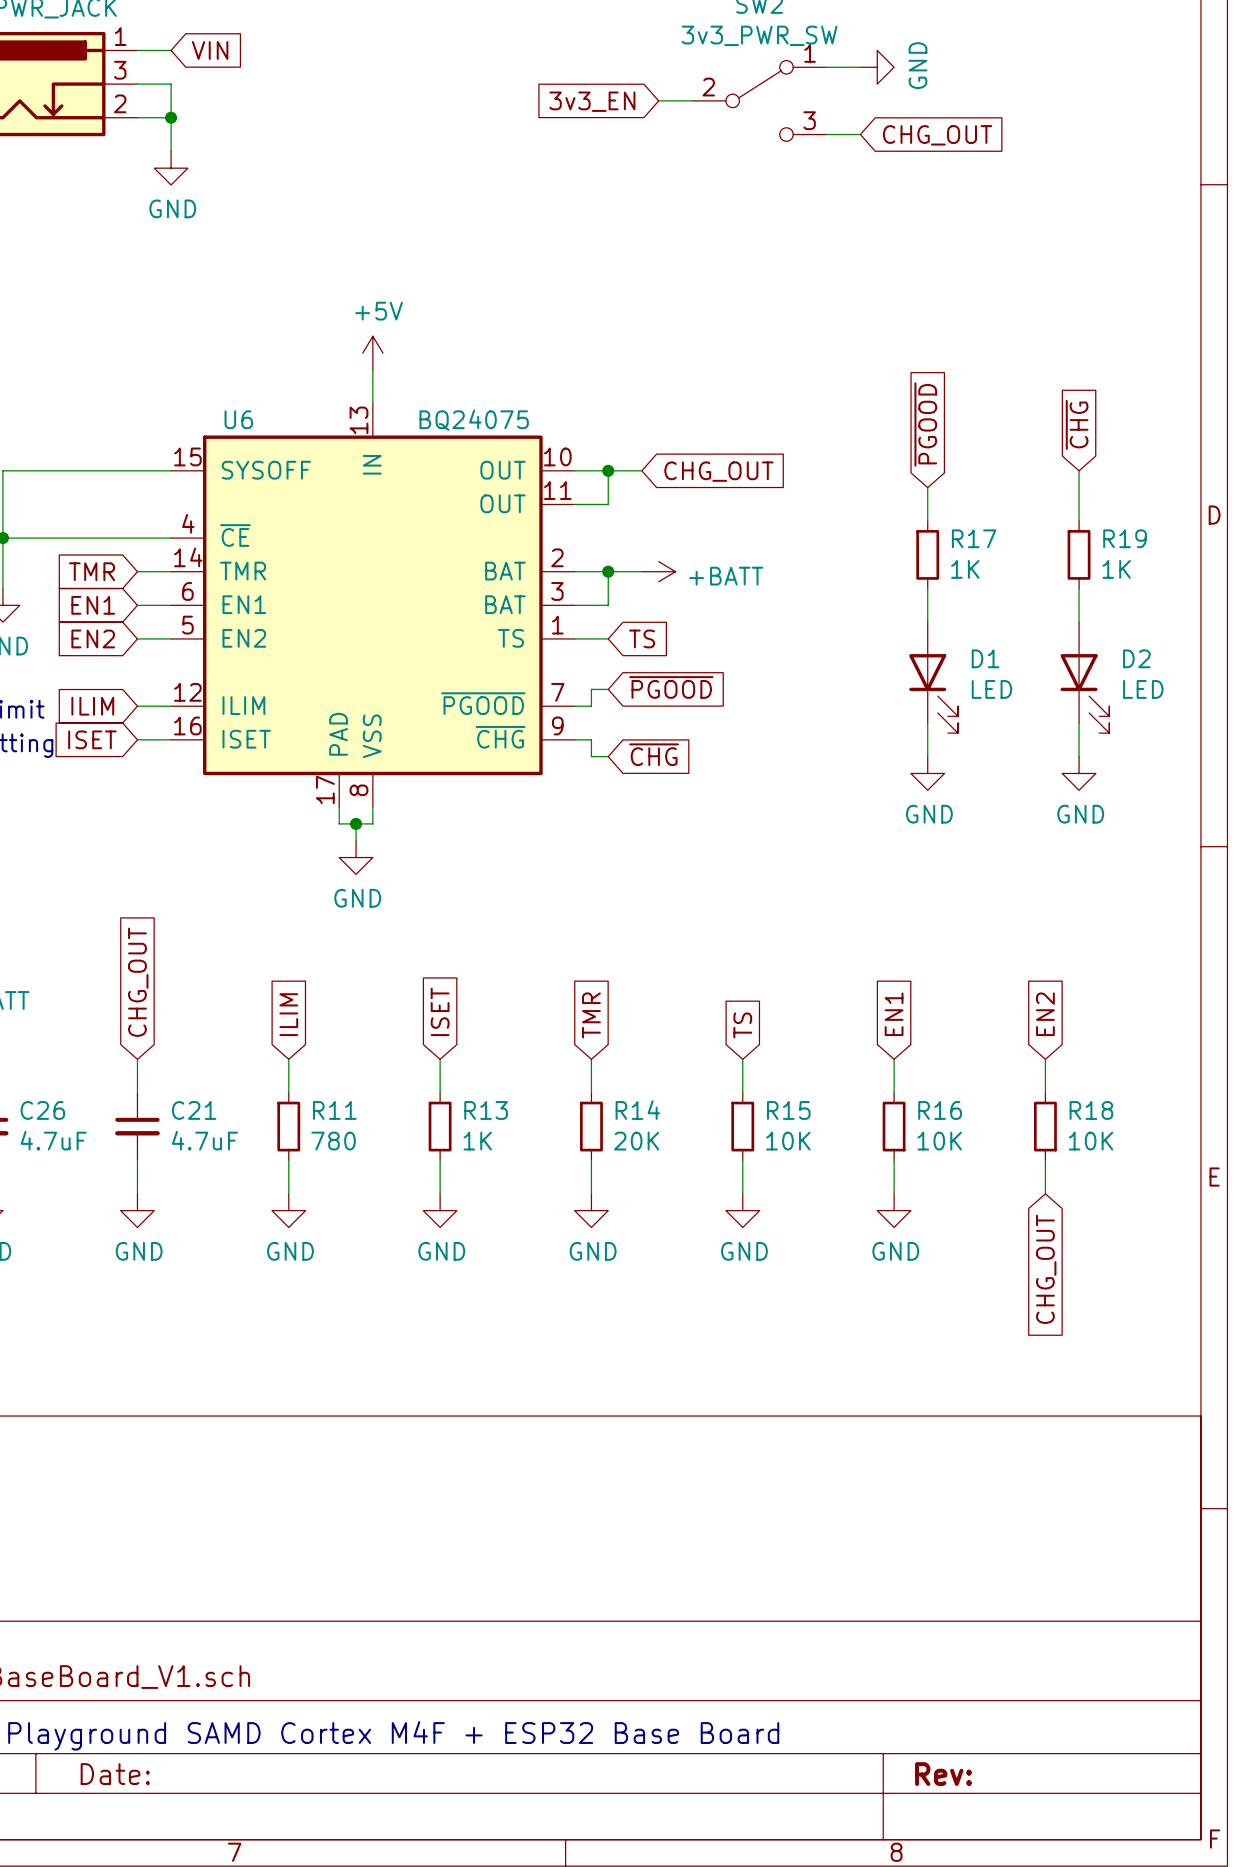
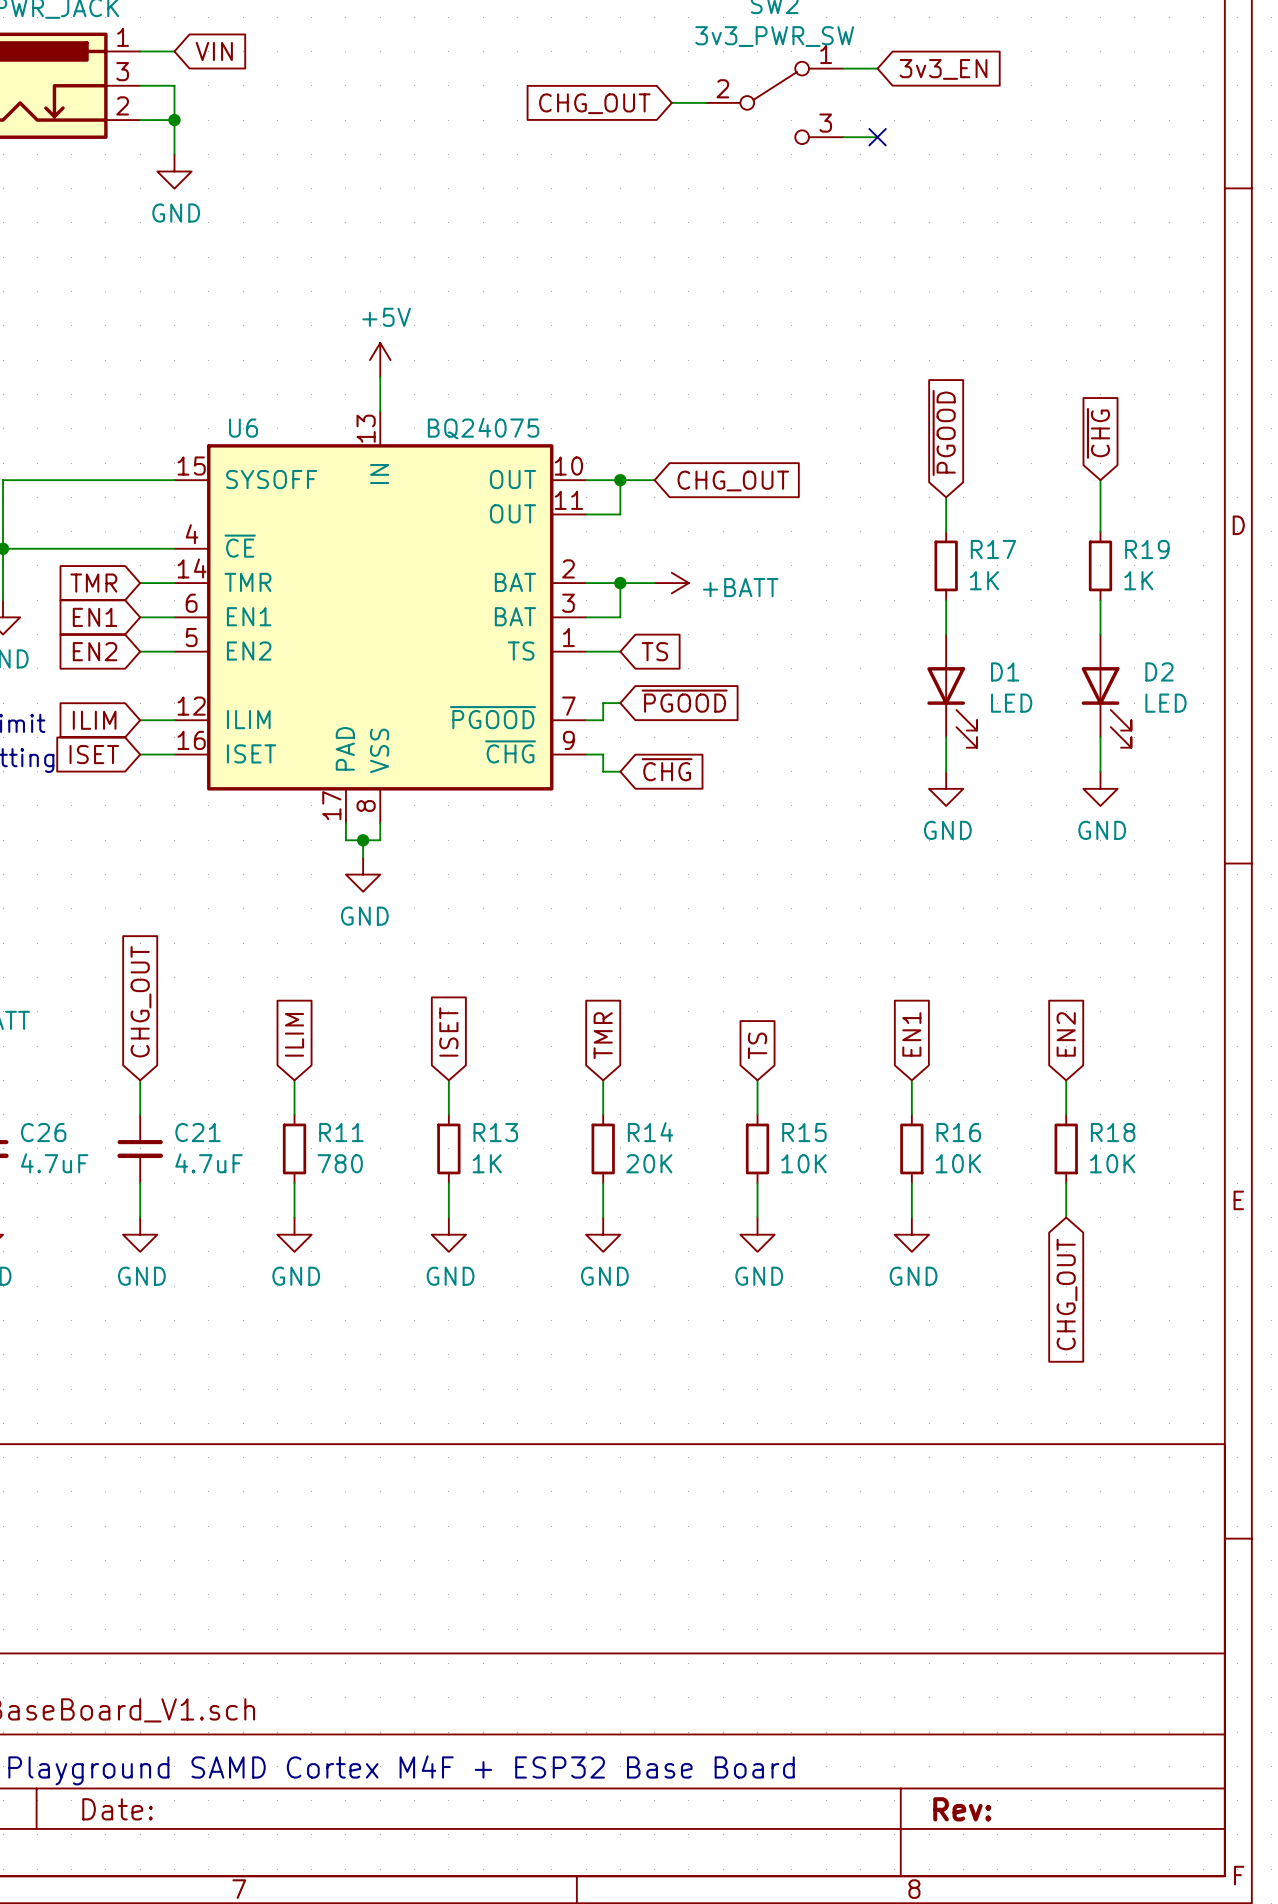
power symbol: GND (877, 67) -> none
global label: none -> 3v3_EN (943, 69)
global label: 3v3_EN (592, 101) -> CHG_OUT (594, 103)
no-connect mark: none -> (877, 137)
global label: CHG_OUT (937, 135) -> none

